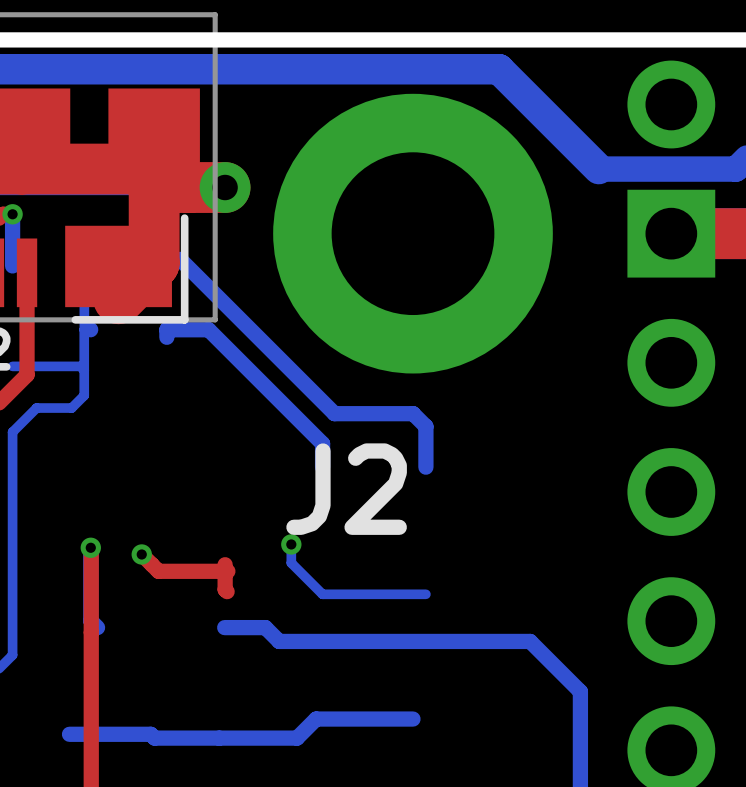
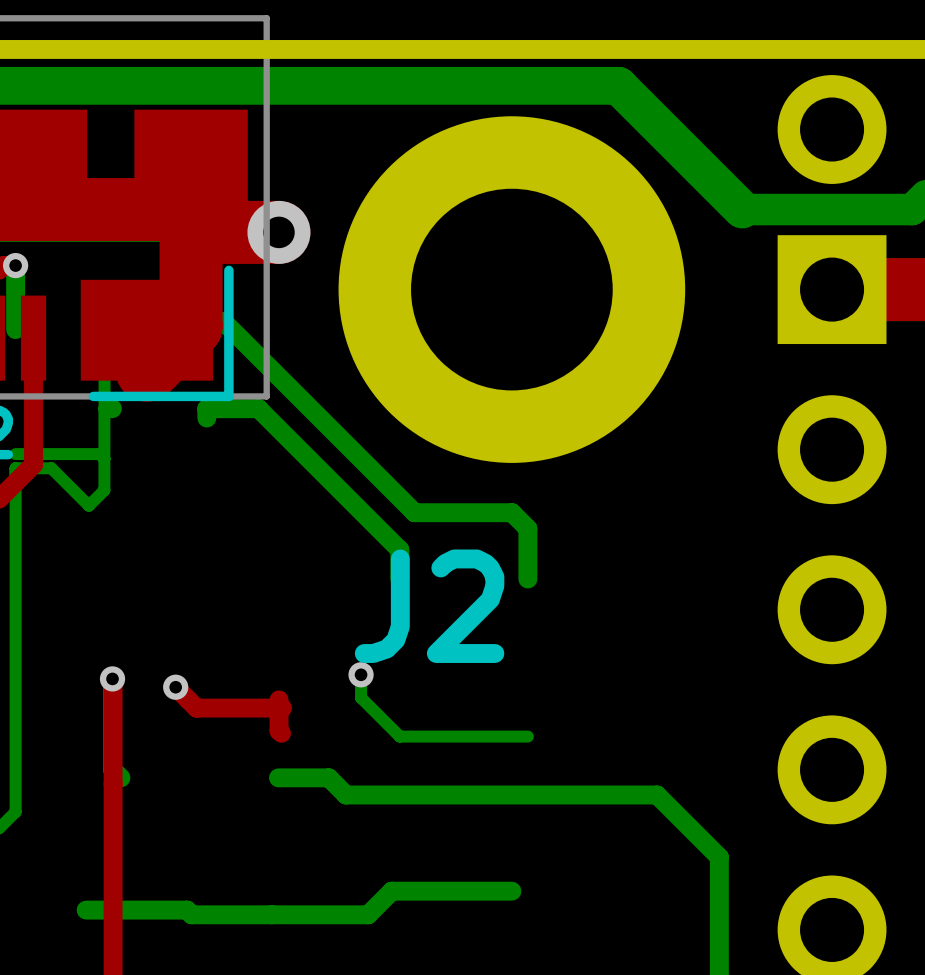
bottom track: (71, 408) (36, 408) (12, 432) -> (88, 505) (51, 468) (15, 468) (15, 535)

